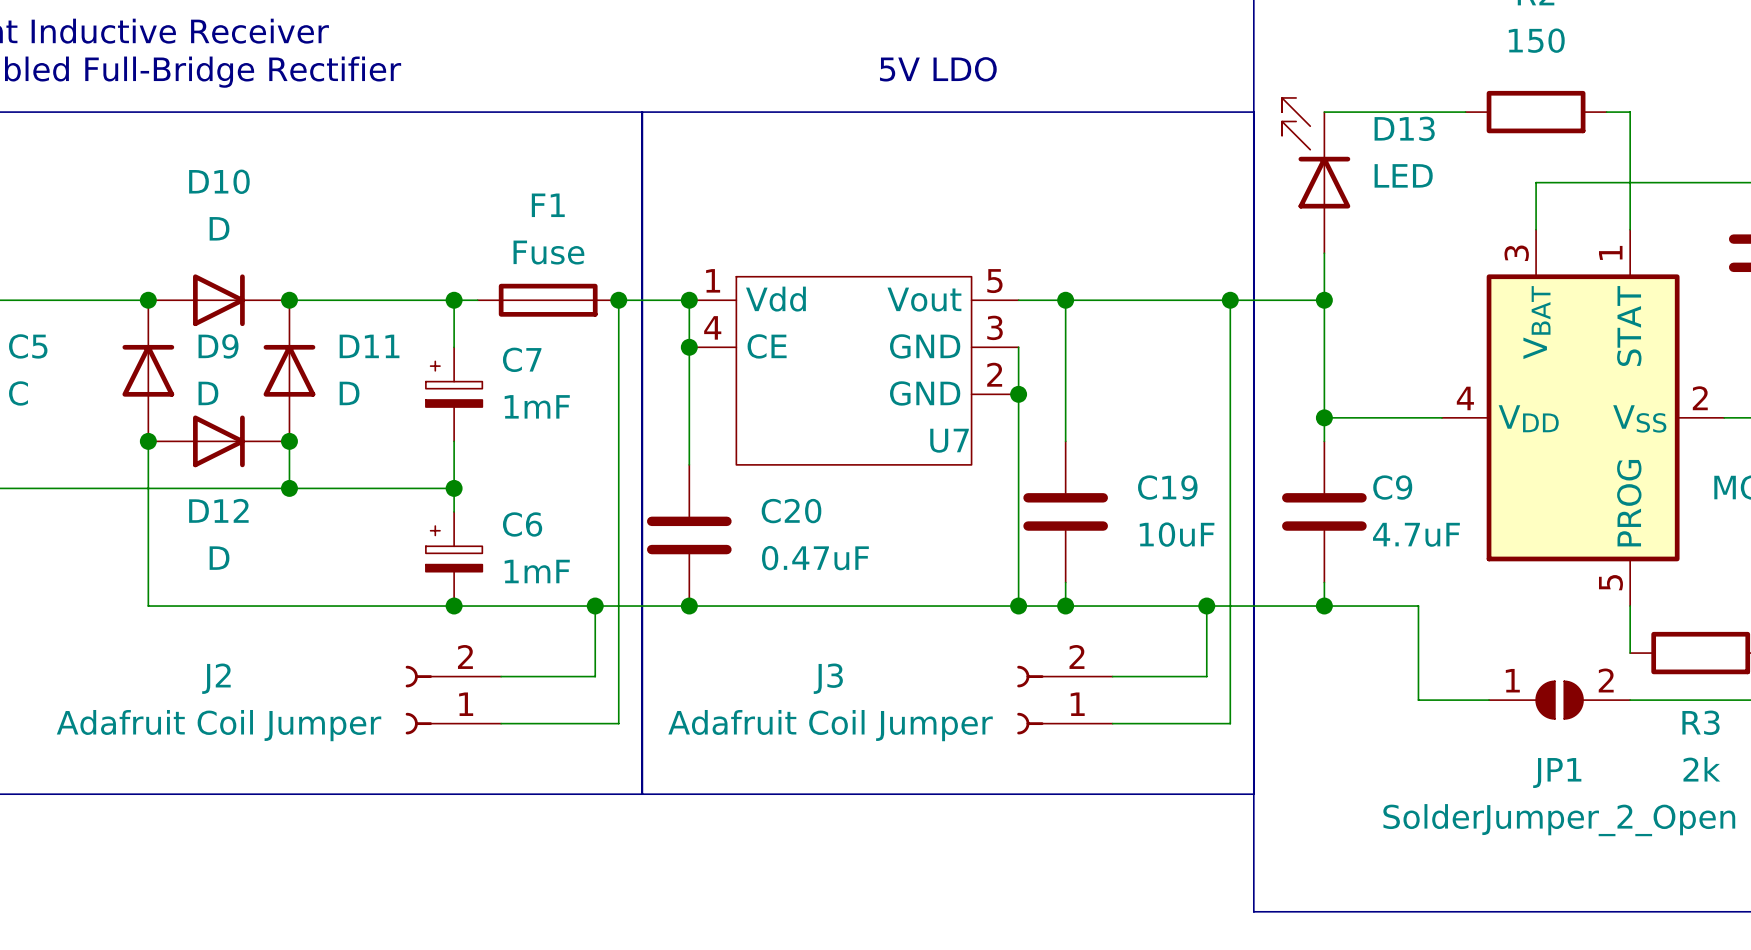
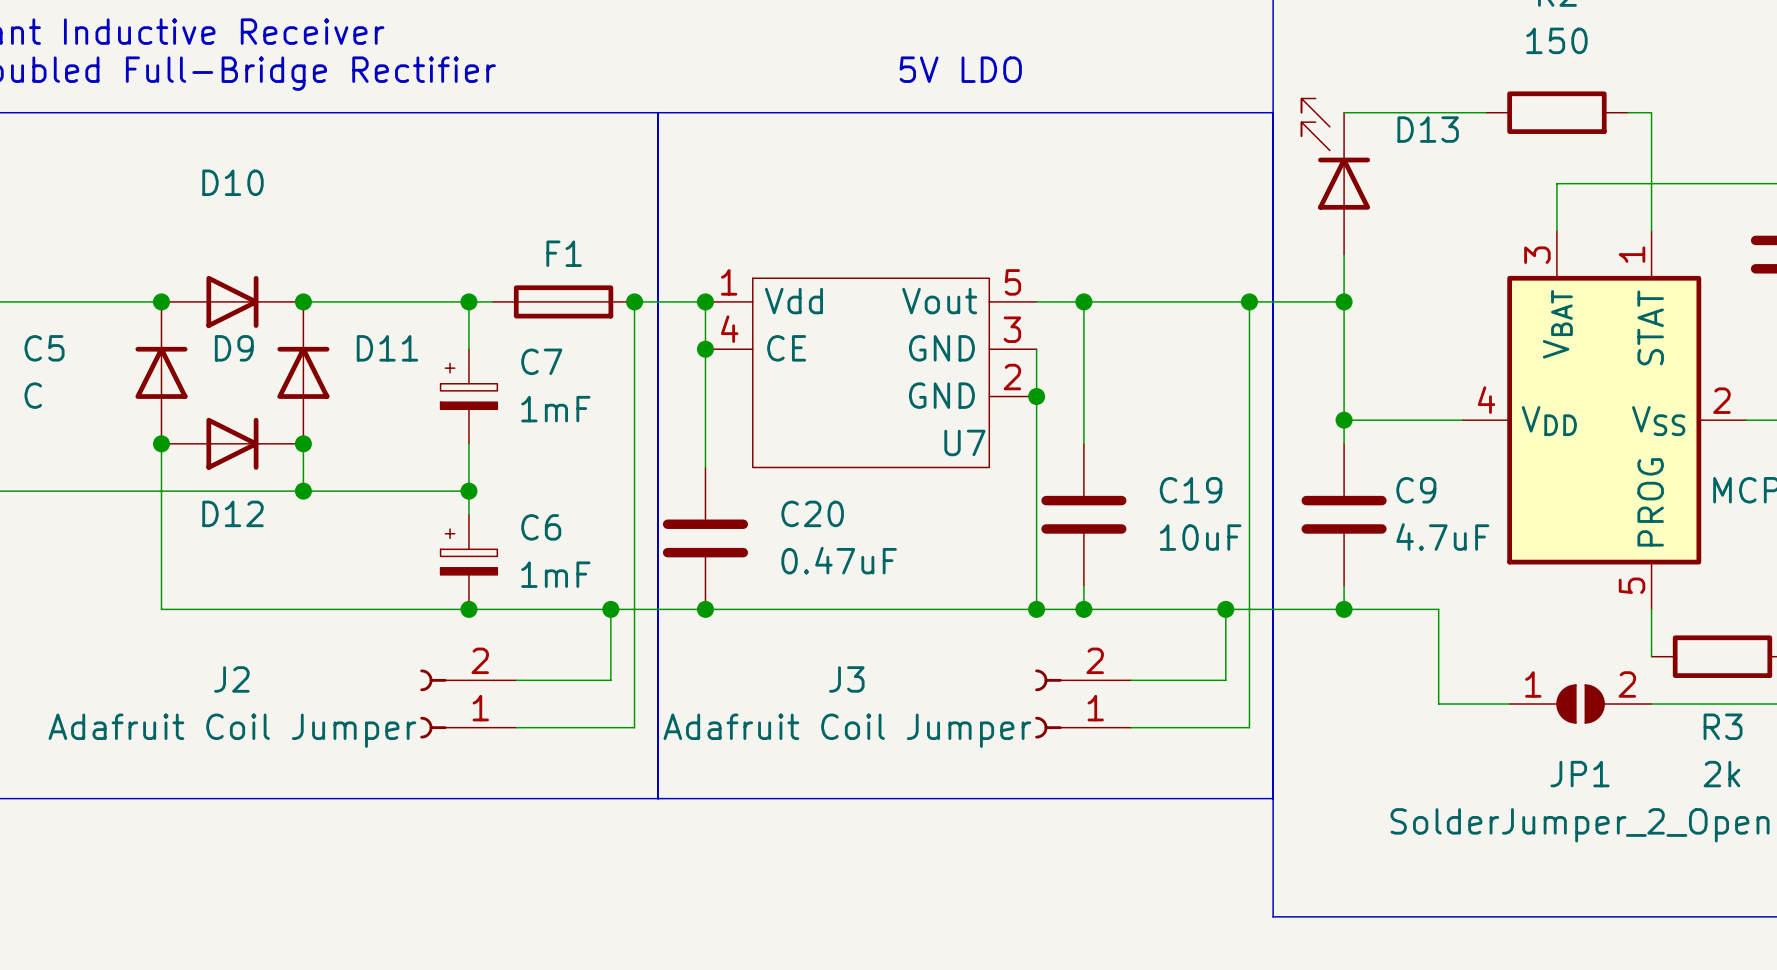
D13 value: LED (1403, 175) -> none
F1 name position: F1 (548, 205) -> F1 (564, 253)
D10 value: D (219, 228) -> none
F1 value: Fuse (548, 252) -> none
D9 value: D (208, 393) -> none
D11 value: D (349, 393) -> none
D12 value: D (219, 558) -> none

